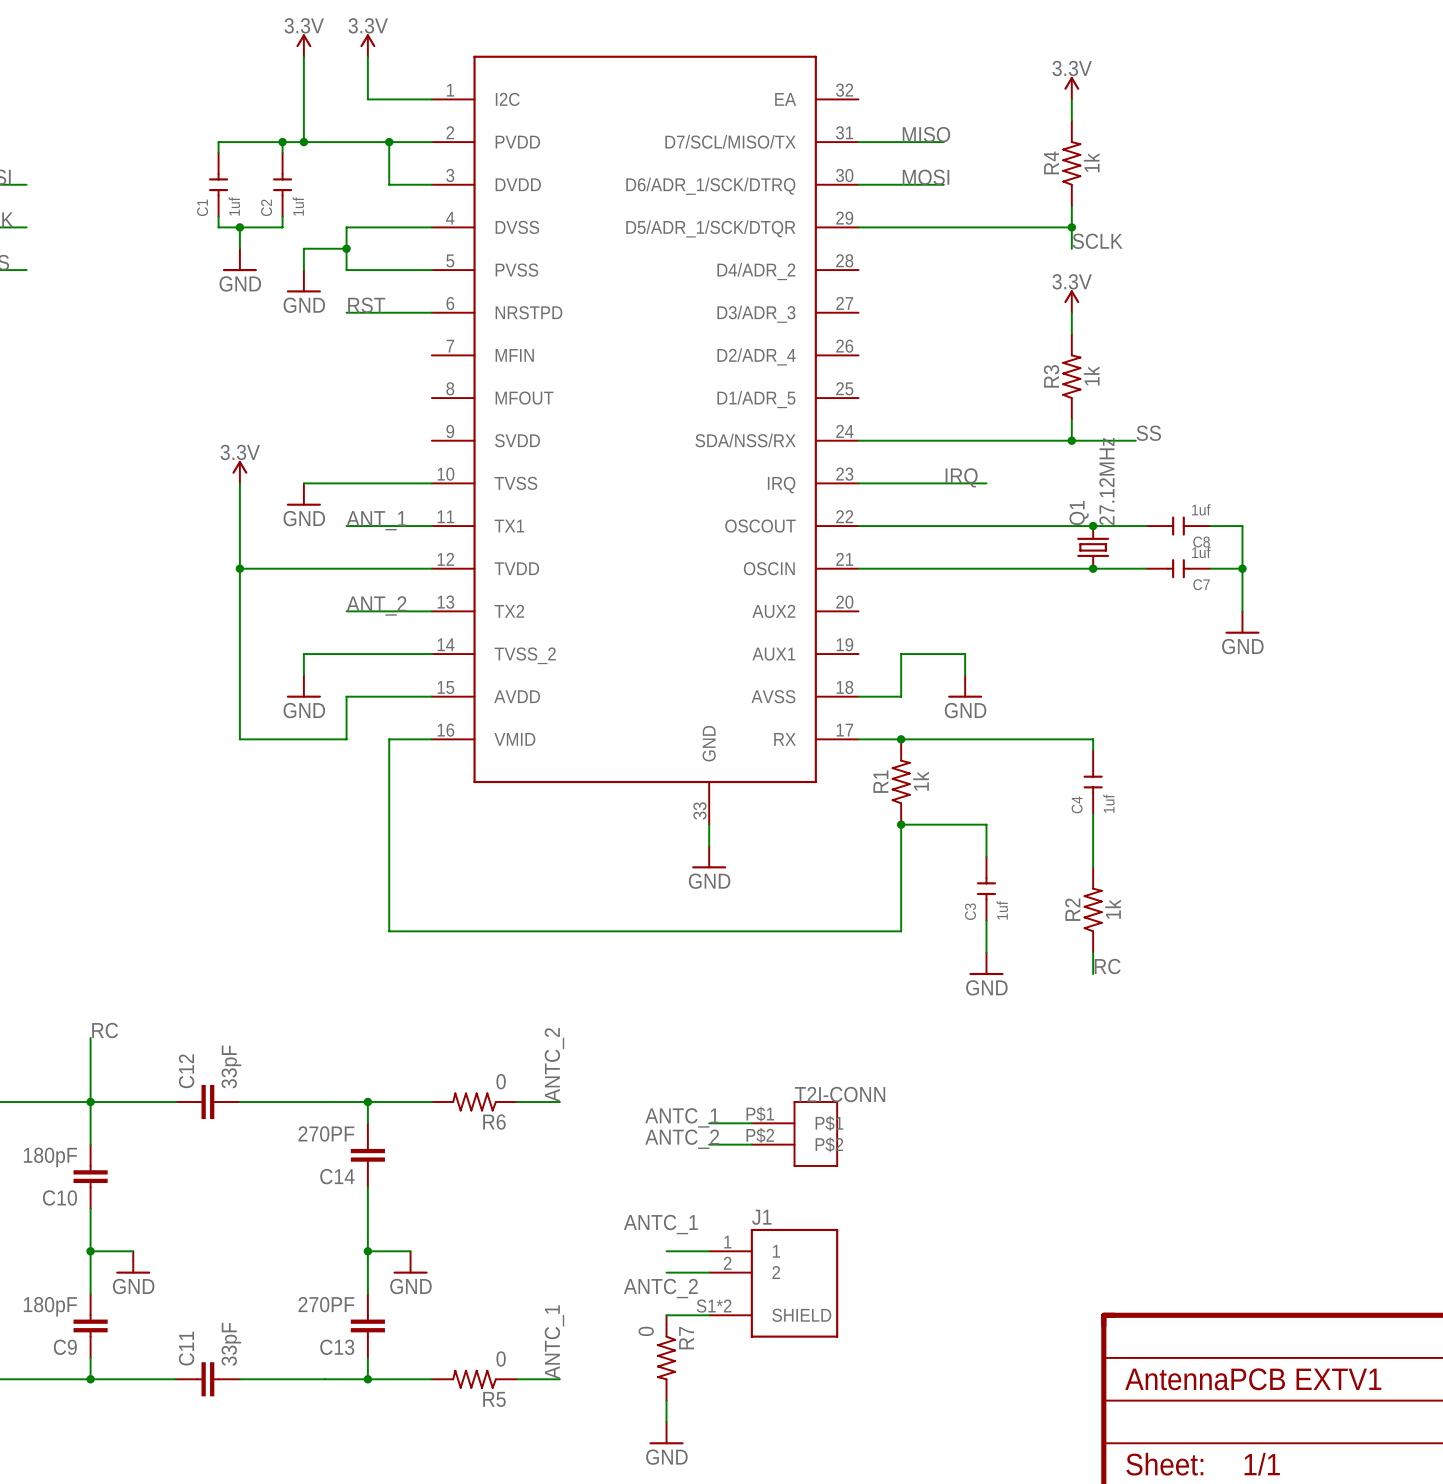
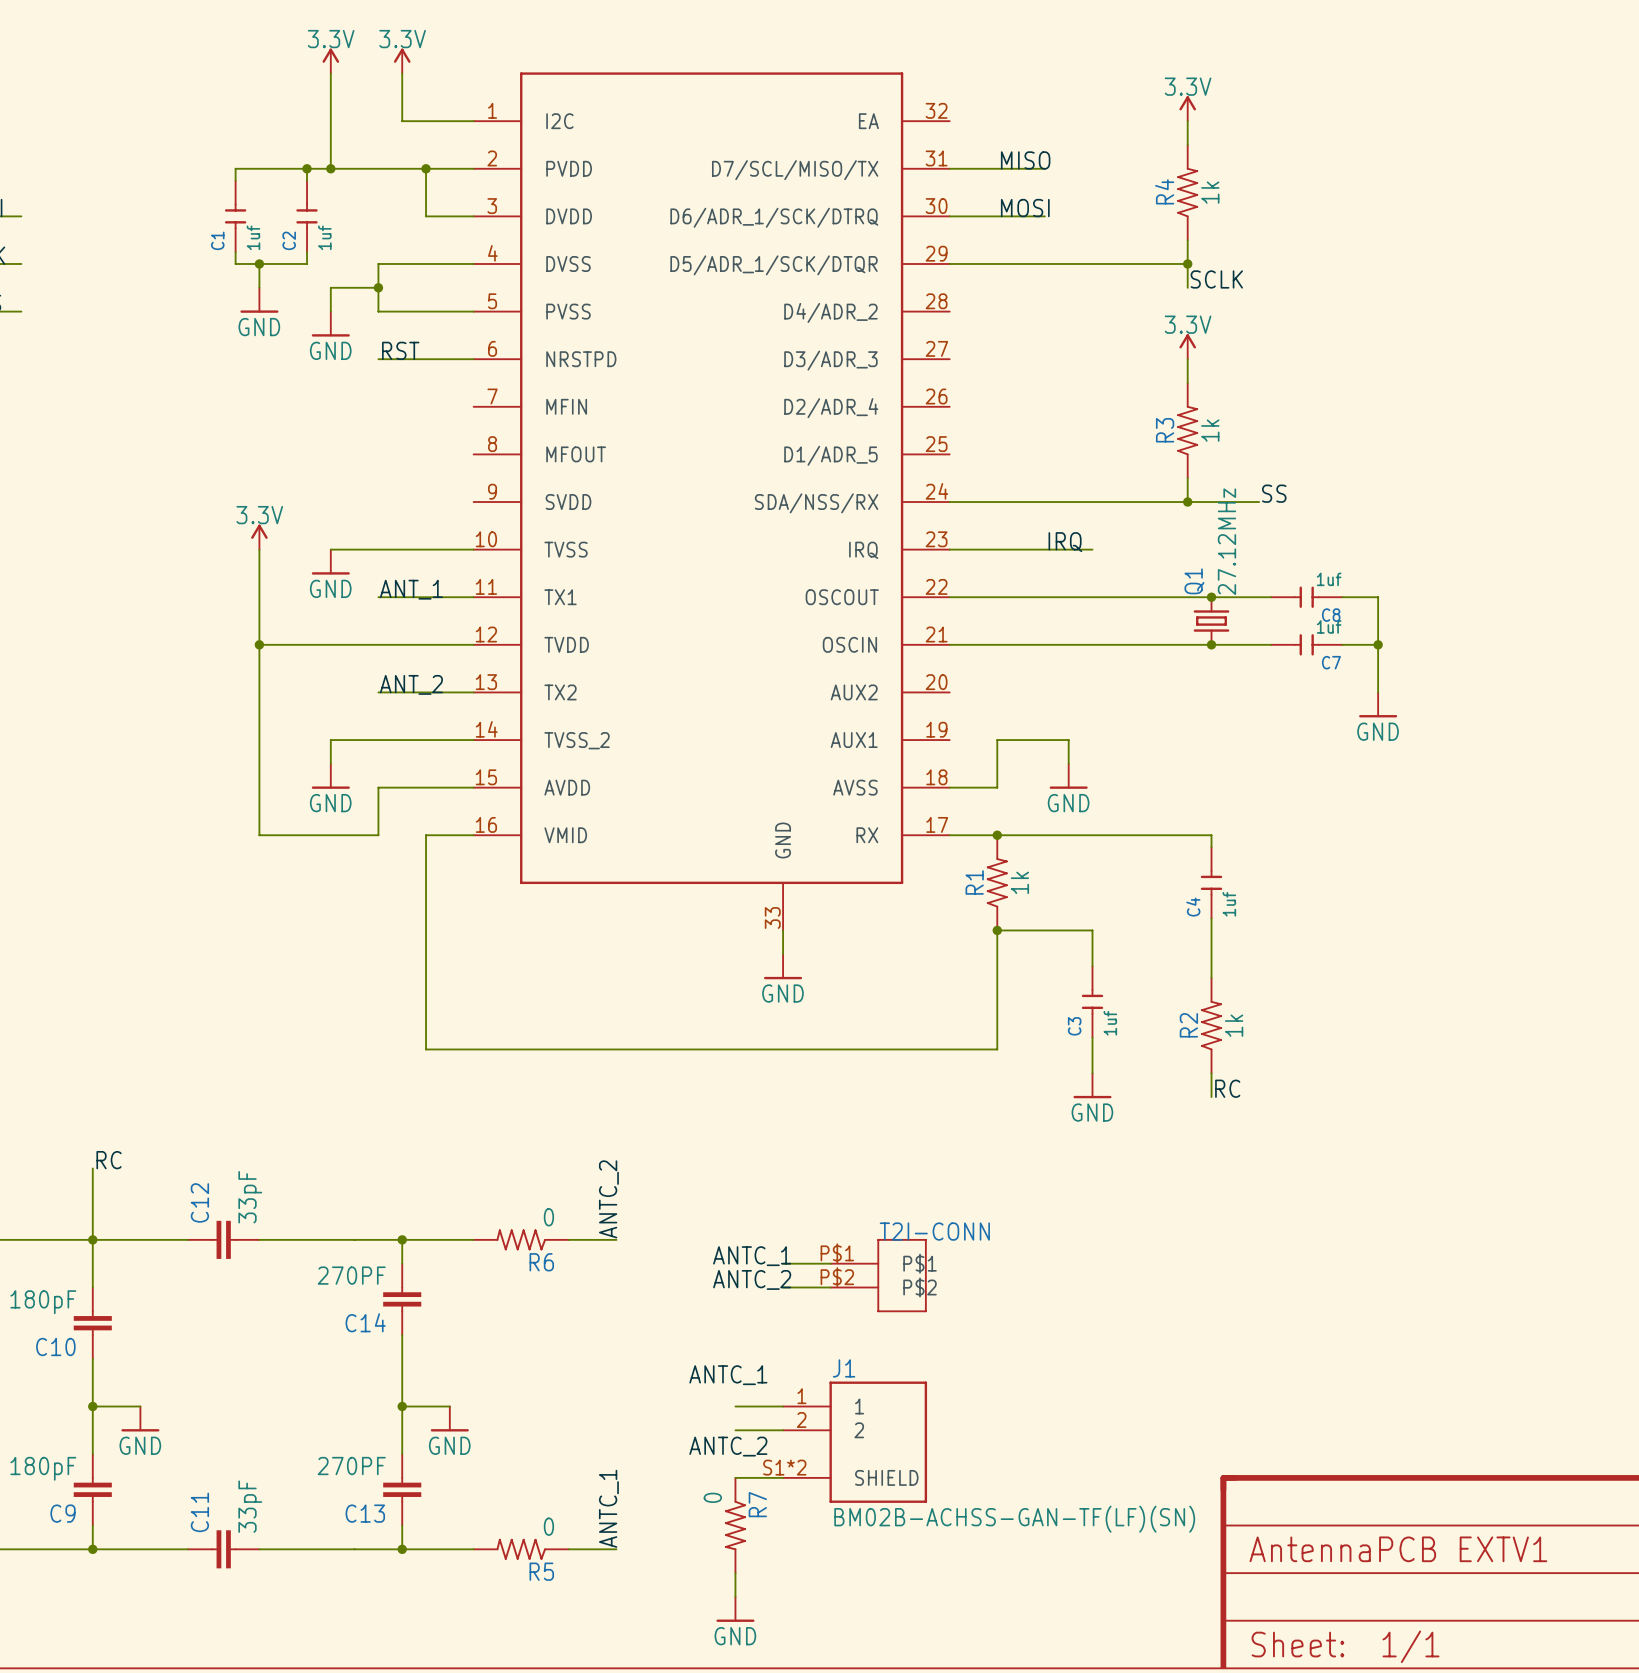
J1 value: none -> BM02B-ACHSS-GAN-TF(LF)(SN) (1014, 1519)

